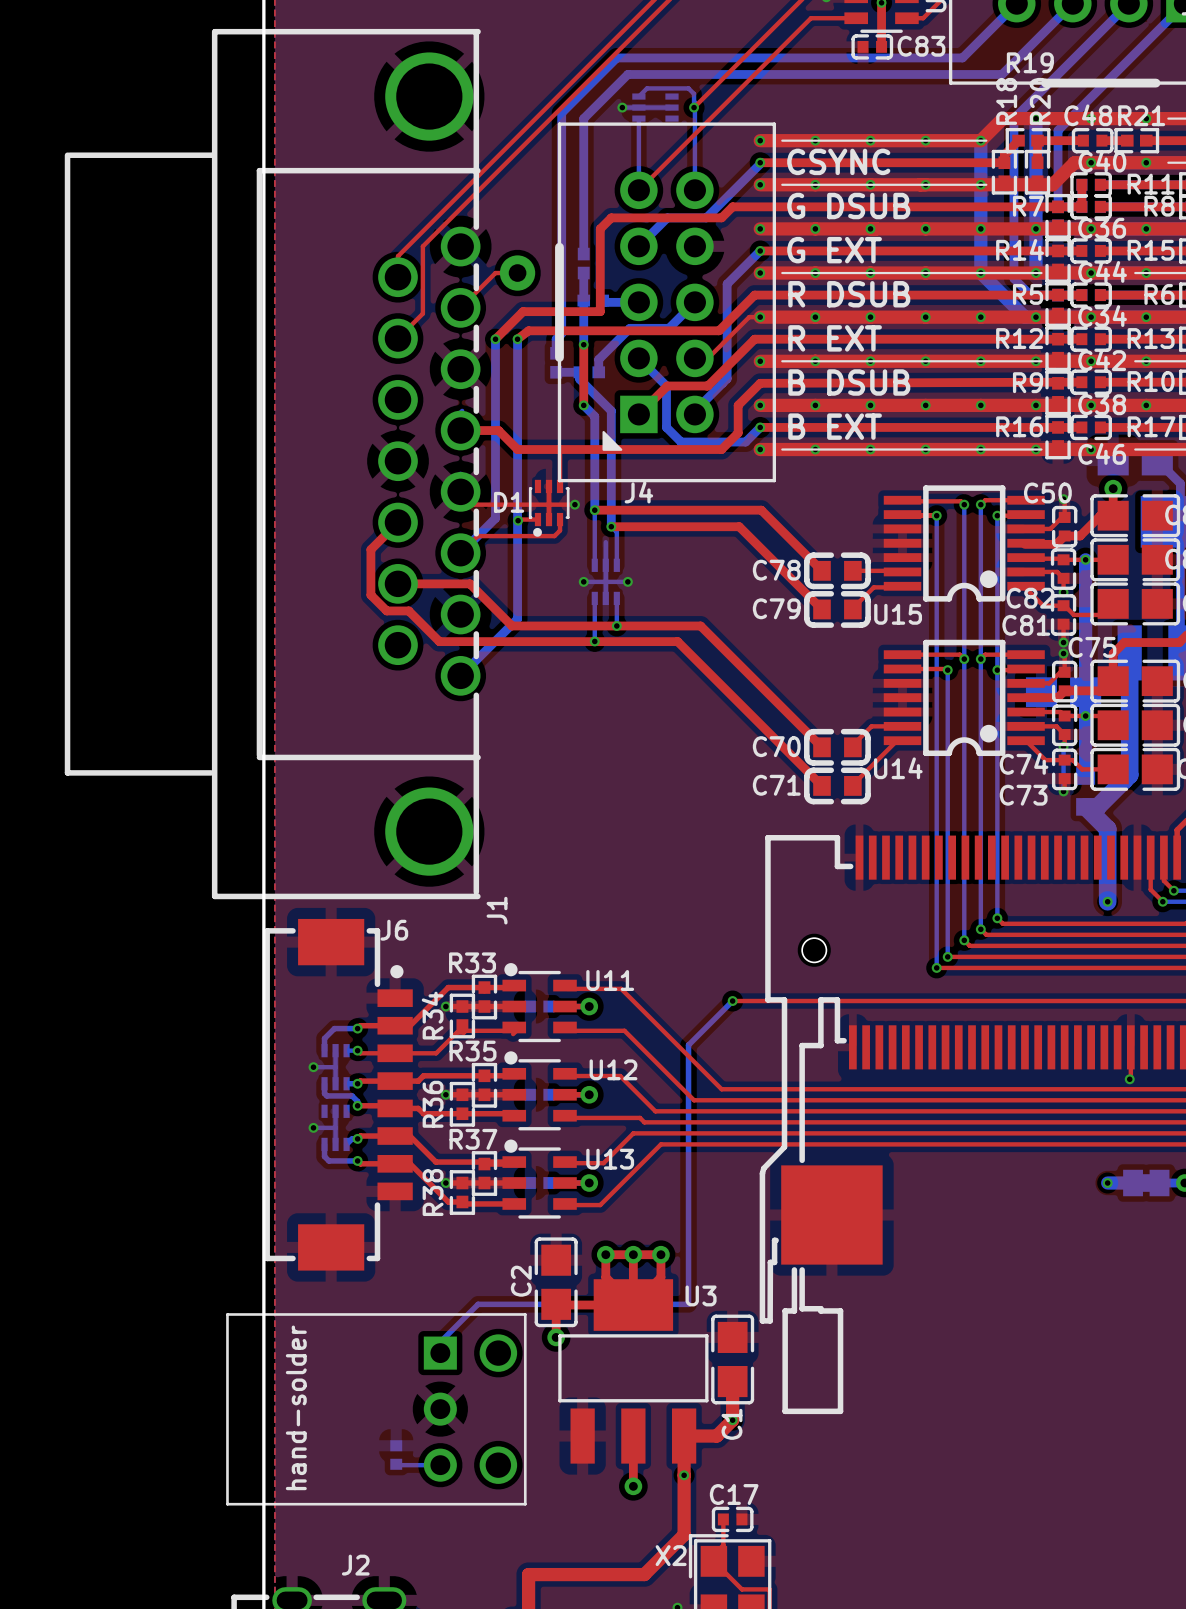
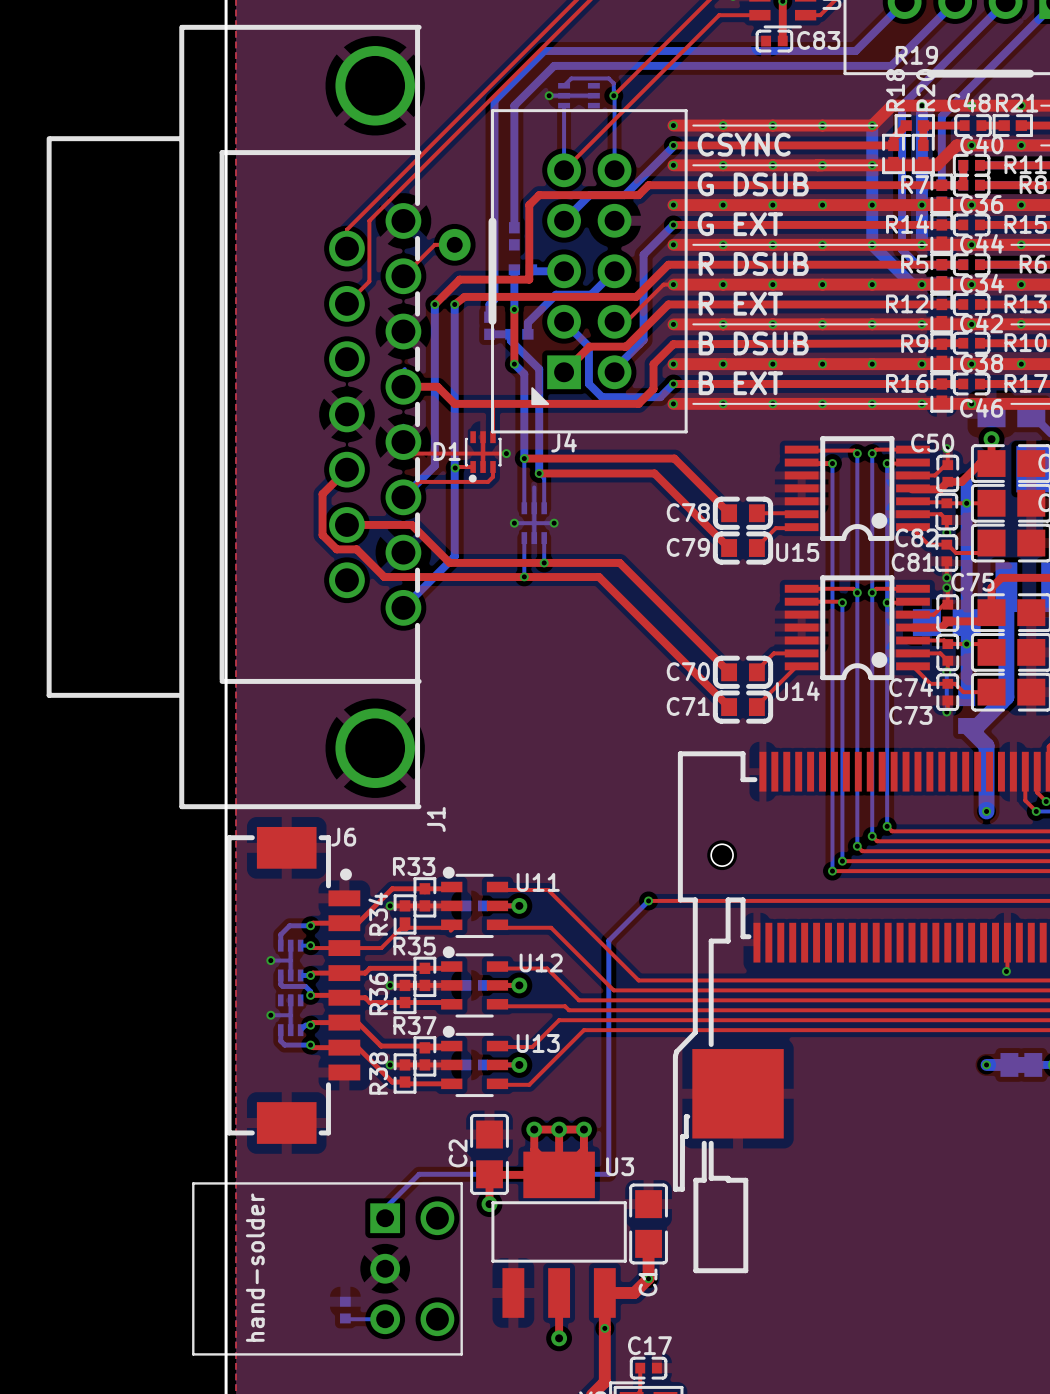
bottom track: (583, 273) (583, 300) -> none
bottom track: none -> (966, 483) (966, 503)

